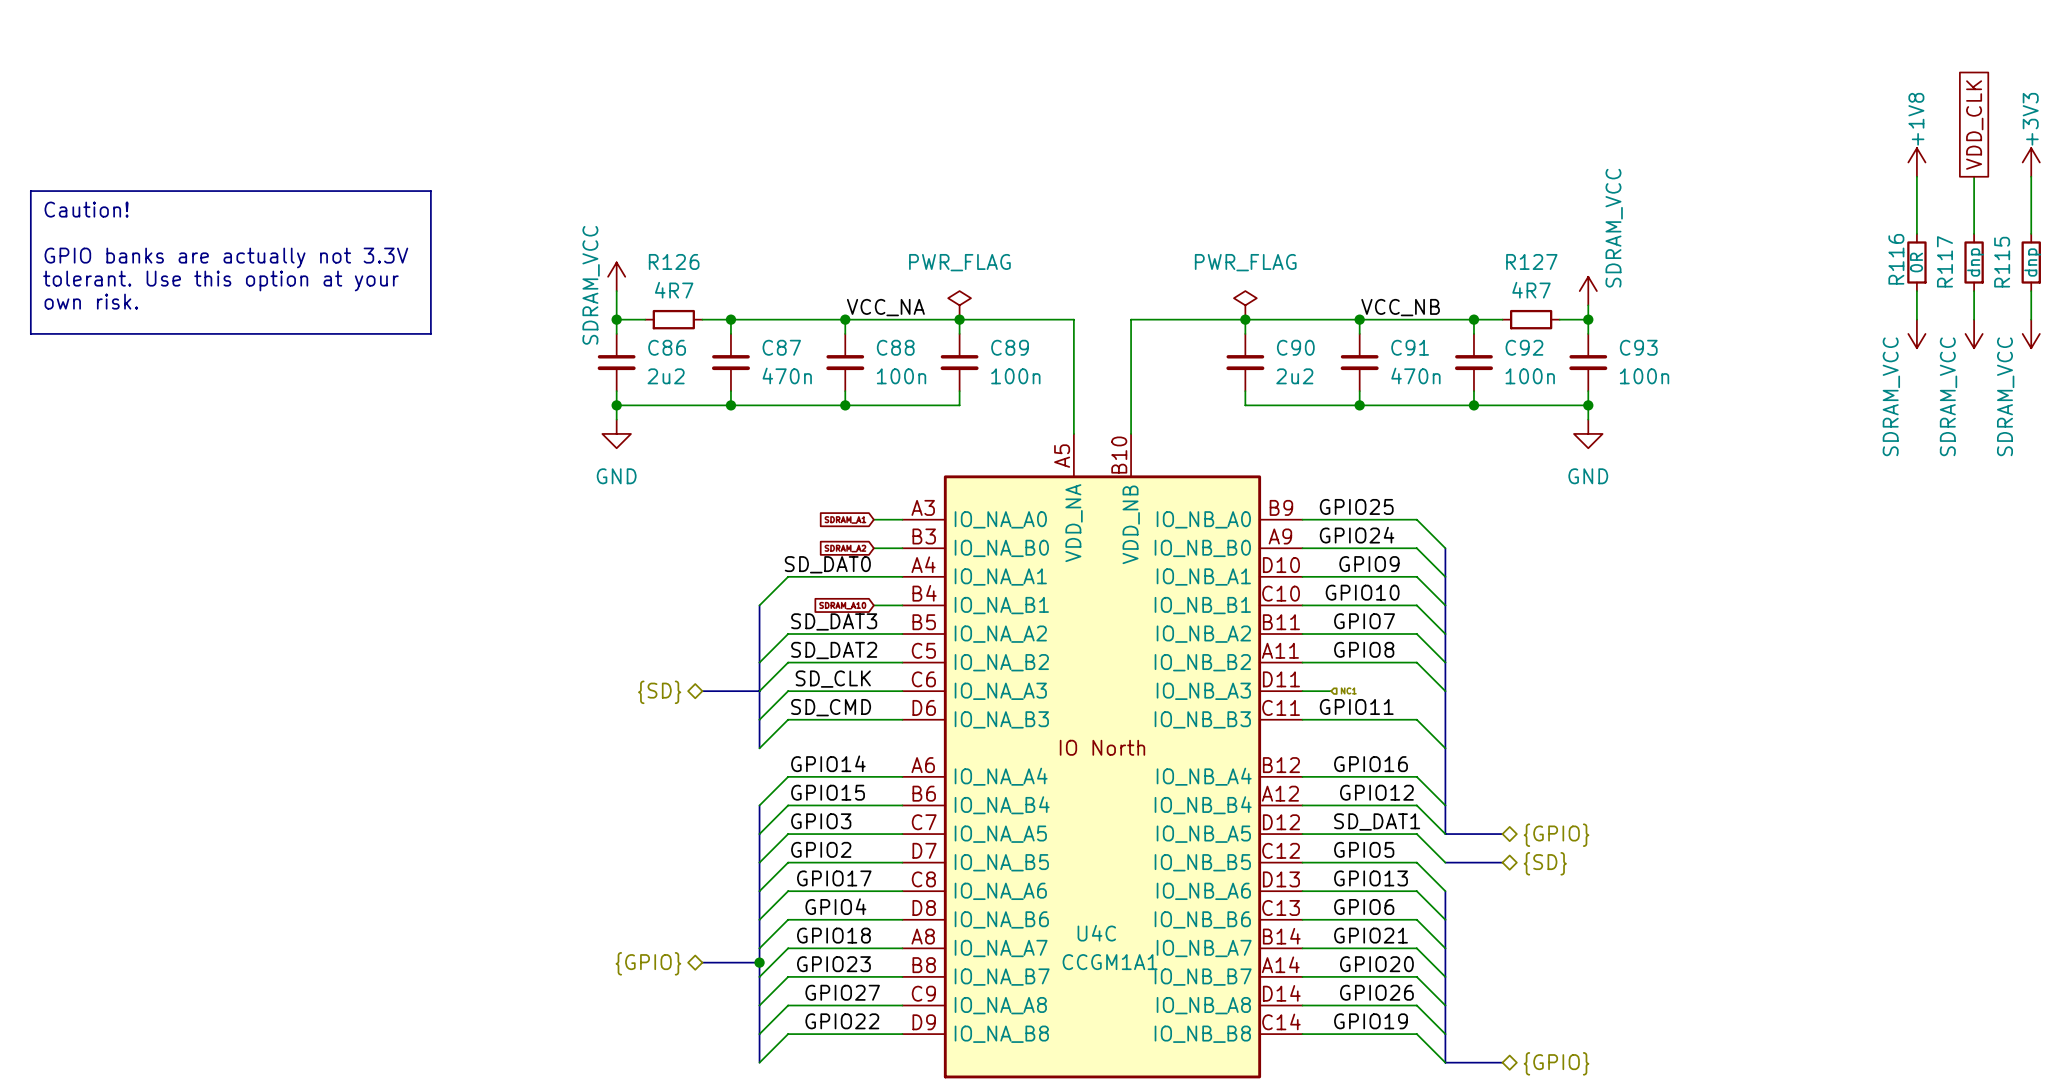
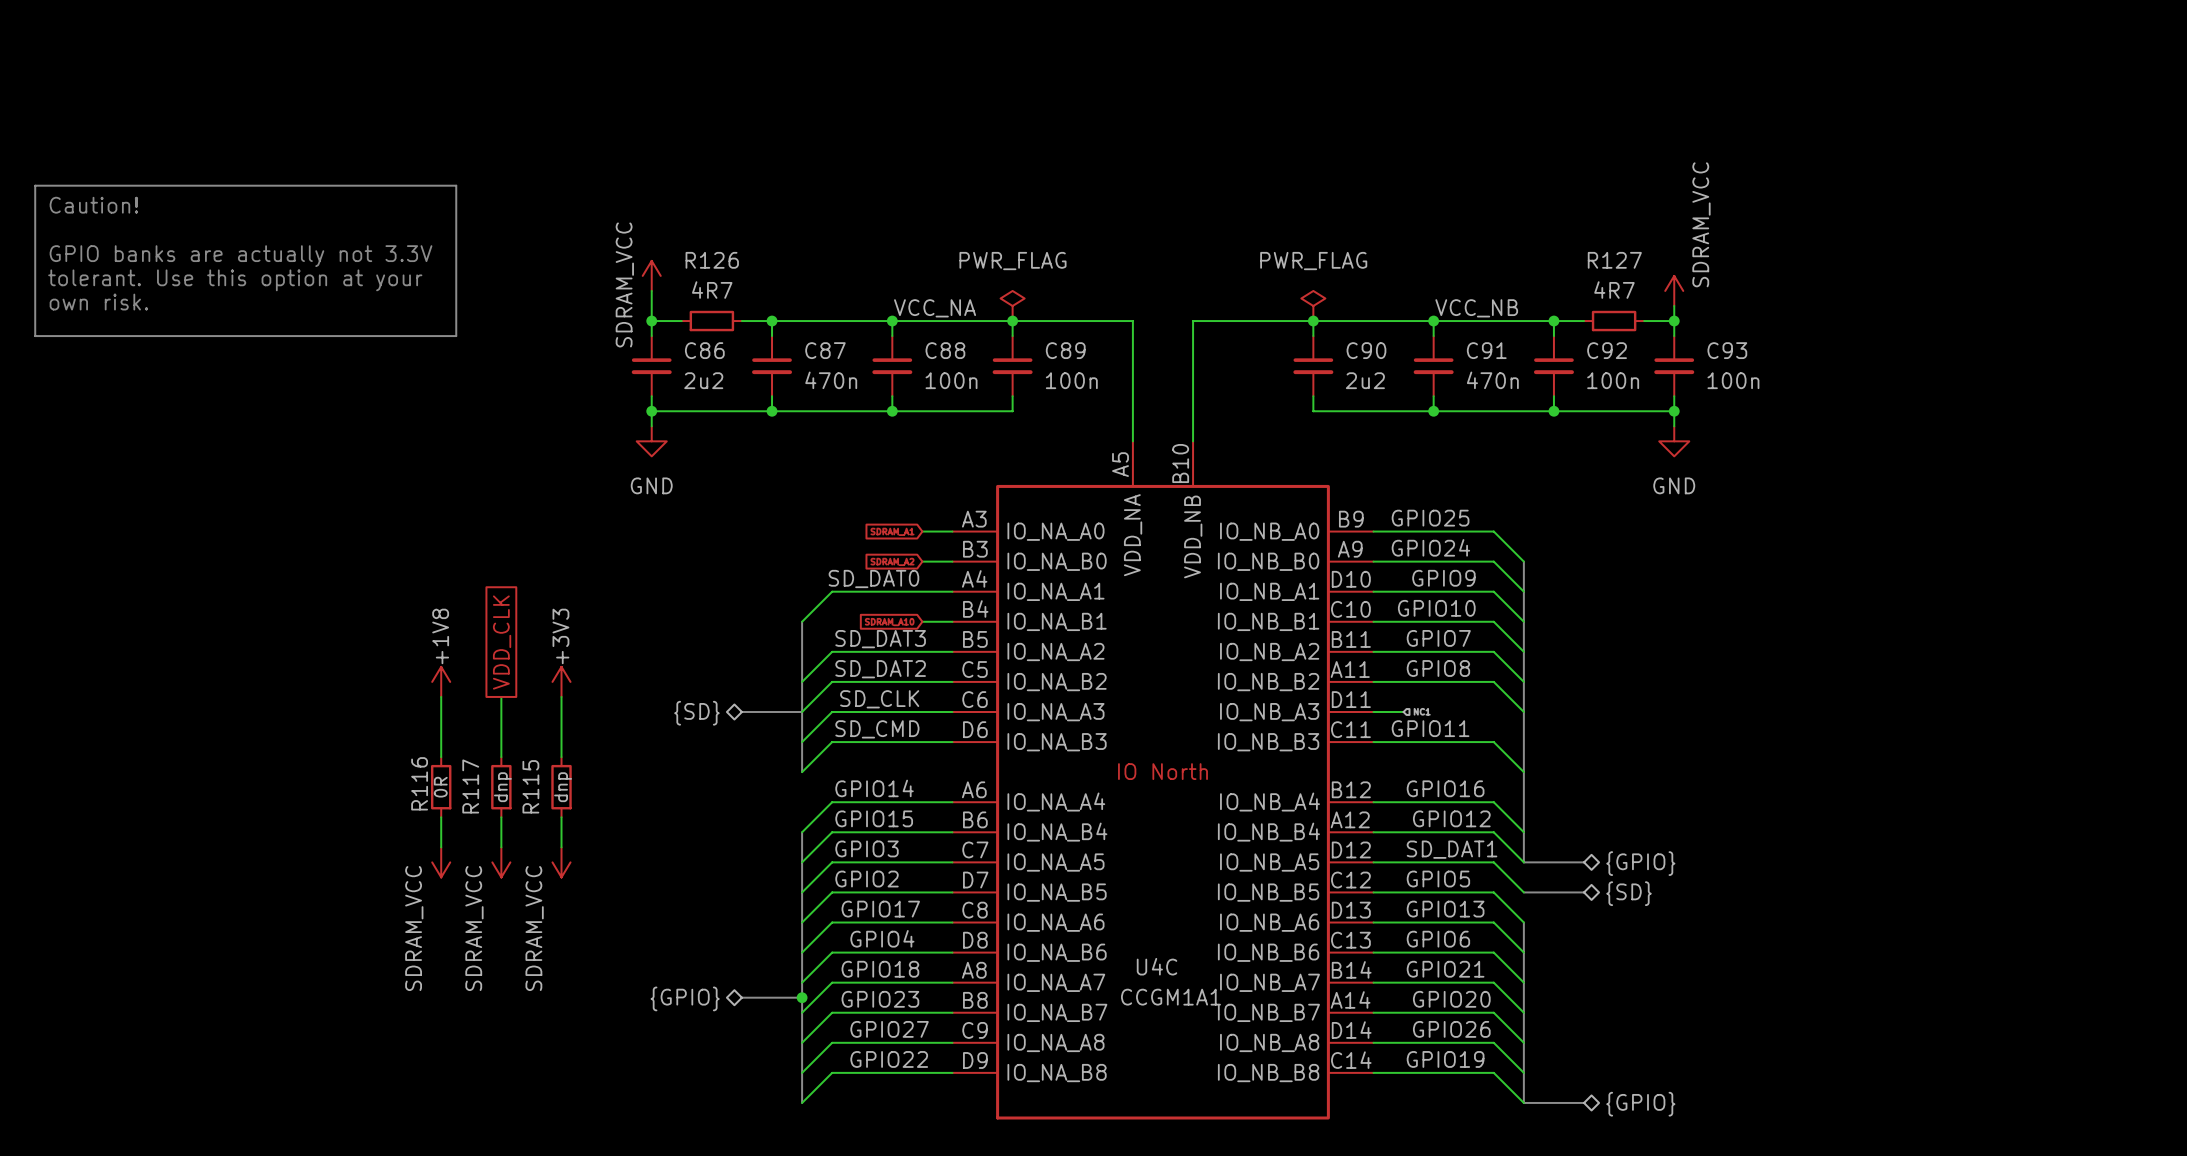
global label: VDD_CLK (1974, 125) -> none
power symbol: +1V8 (1916, 162) -> none
power symbol: +3V3 (2031, 162) -> none
wire: (1916, 176) (1916, 233) -> none
wire: (1974, 176) (1974, 233) -> none
wire: (2031, 176) (2031, 233) -> none
R116 position: (1916, 262) -> (441, 787)
R117 position: (1974, 262) -> (501, 787)
R115 position: (2031, 262) -> (561, 787)
wire: (1916, 291) (1916, 319) -> none
wire: (1974, 291) (1974, 319) -> none
wire: (2031, 291) (2031, 319) -> none
power symbol: SDRAM_VCC (1916, 333) -> none
power symbol: SDRAM_VCC (1974, 333) -> none
power symbol: SDRAM_VCC (2031, 333) -> none
global label: none -> VDD_CLK (502, 642)
power symbol: none -> +1V8 (441, 681)
power symbol: none -> +3V3 (561, 681)
wire: none -> (441, 696) (441, 757)
wire: none -> (501, 696) (501, 757)
wire: none -> (561, 696) (561, 757)
wire: none -> (441, 817) (441, 847)
wire: none -> (501, 817) (501, 847)
wire: none -> (561, 817) (561, 847)
power symbol: none -> SDRAM_VCC (441, 862)
power symbol: none -> SDRAM_VCC (501, 862)
power symbol: none -> SDRAM_VCC (561, 862)

